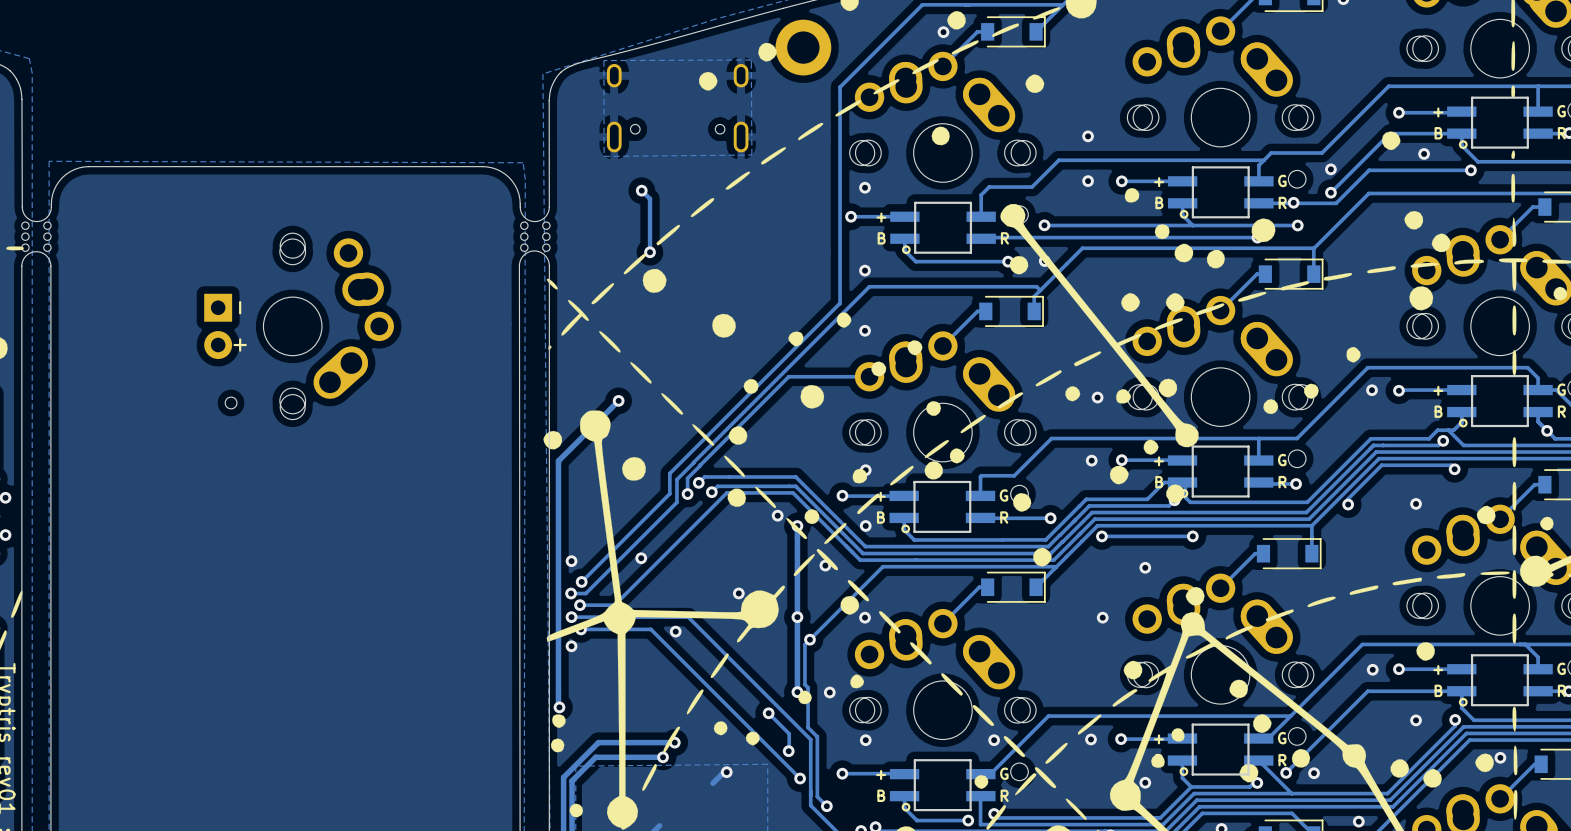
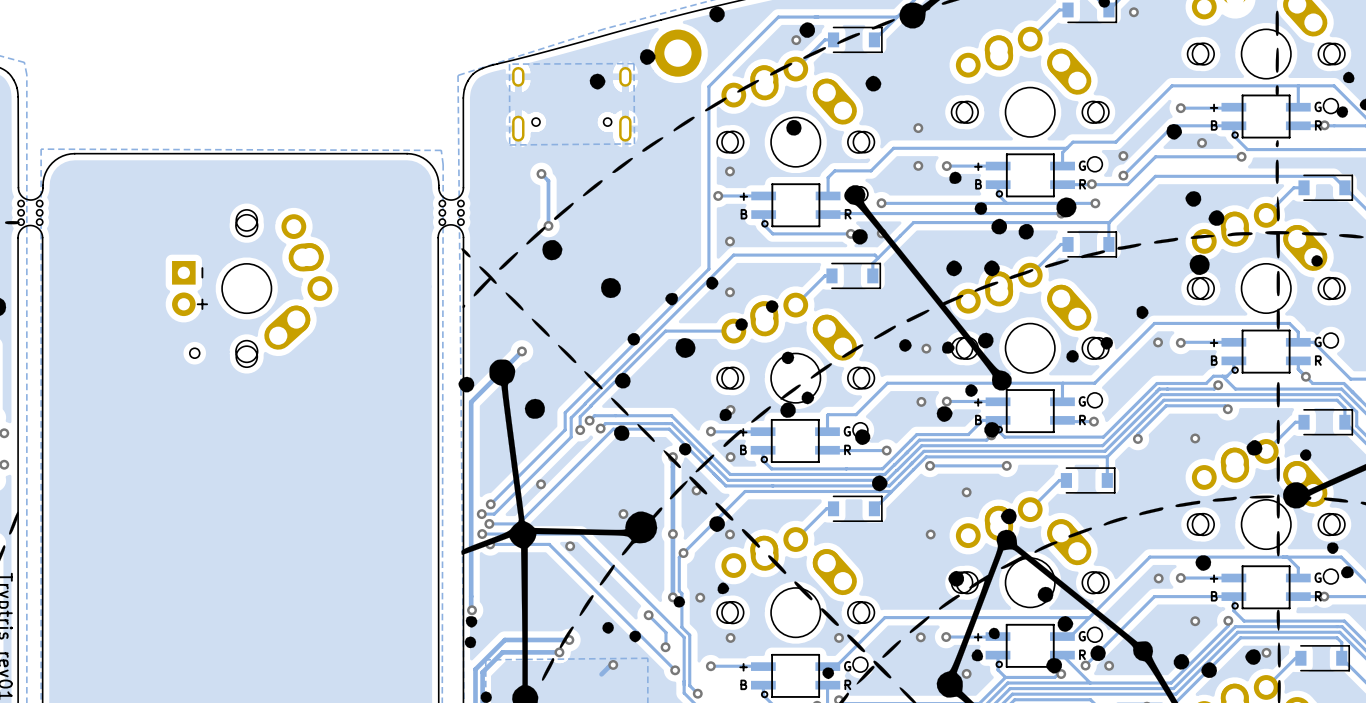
via: (777, 515) -> none
via: (571, 561) -> none
via: (571, 646) -> none

